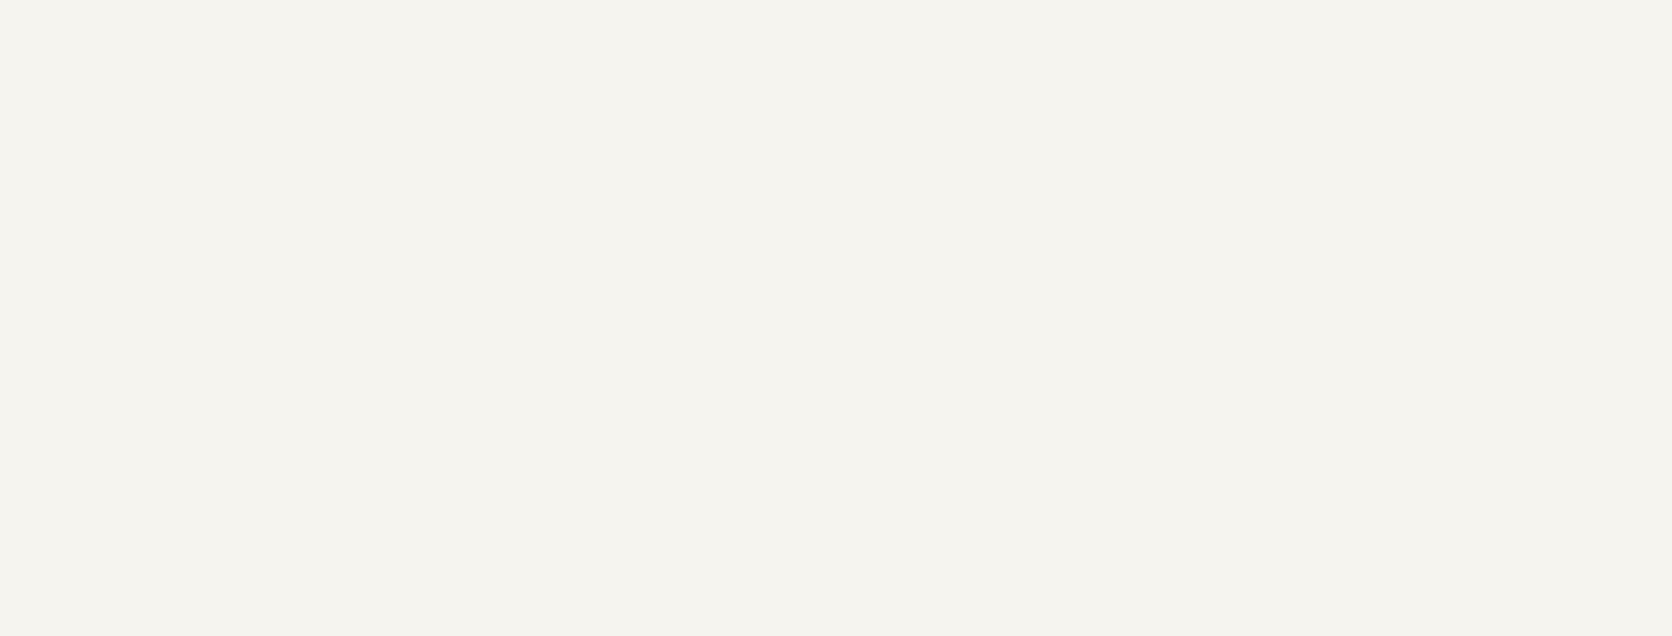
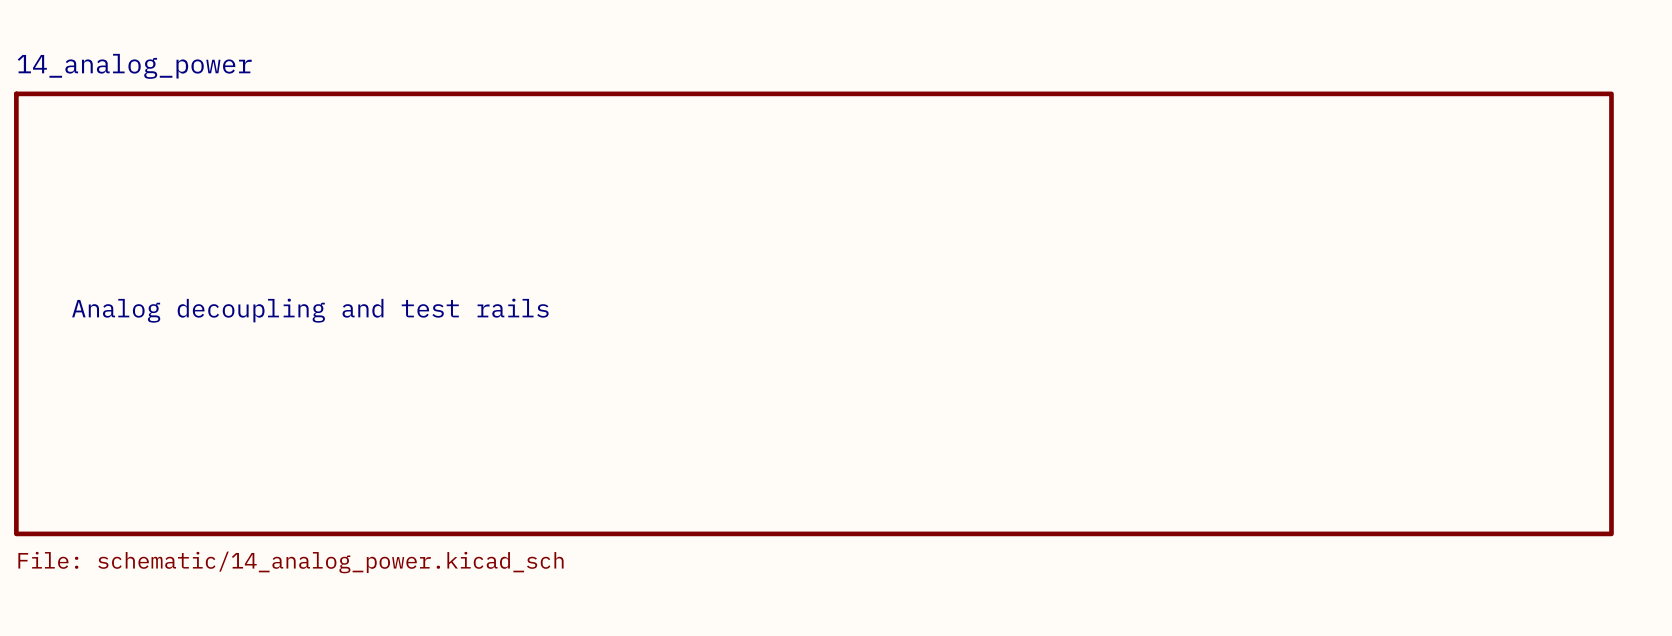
text: none -> Analog decoupling and test rails (310, 310)
sheet 14_analog_power: none -> File: schematic/14_analog_power.kicad_sch (813, 313)

